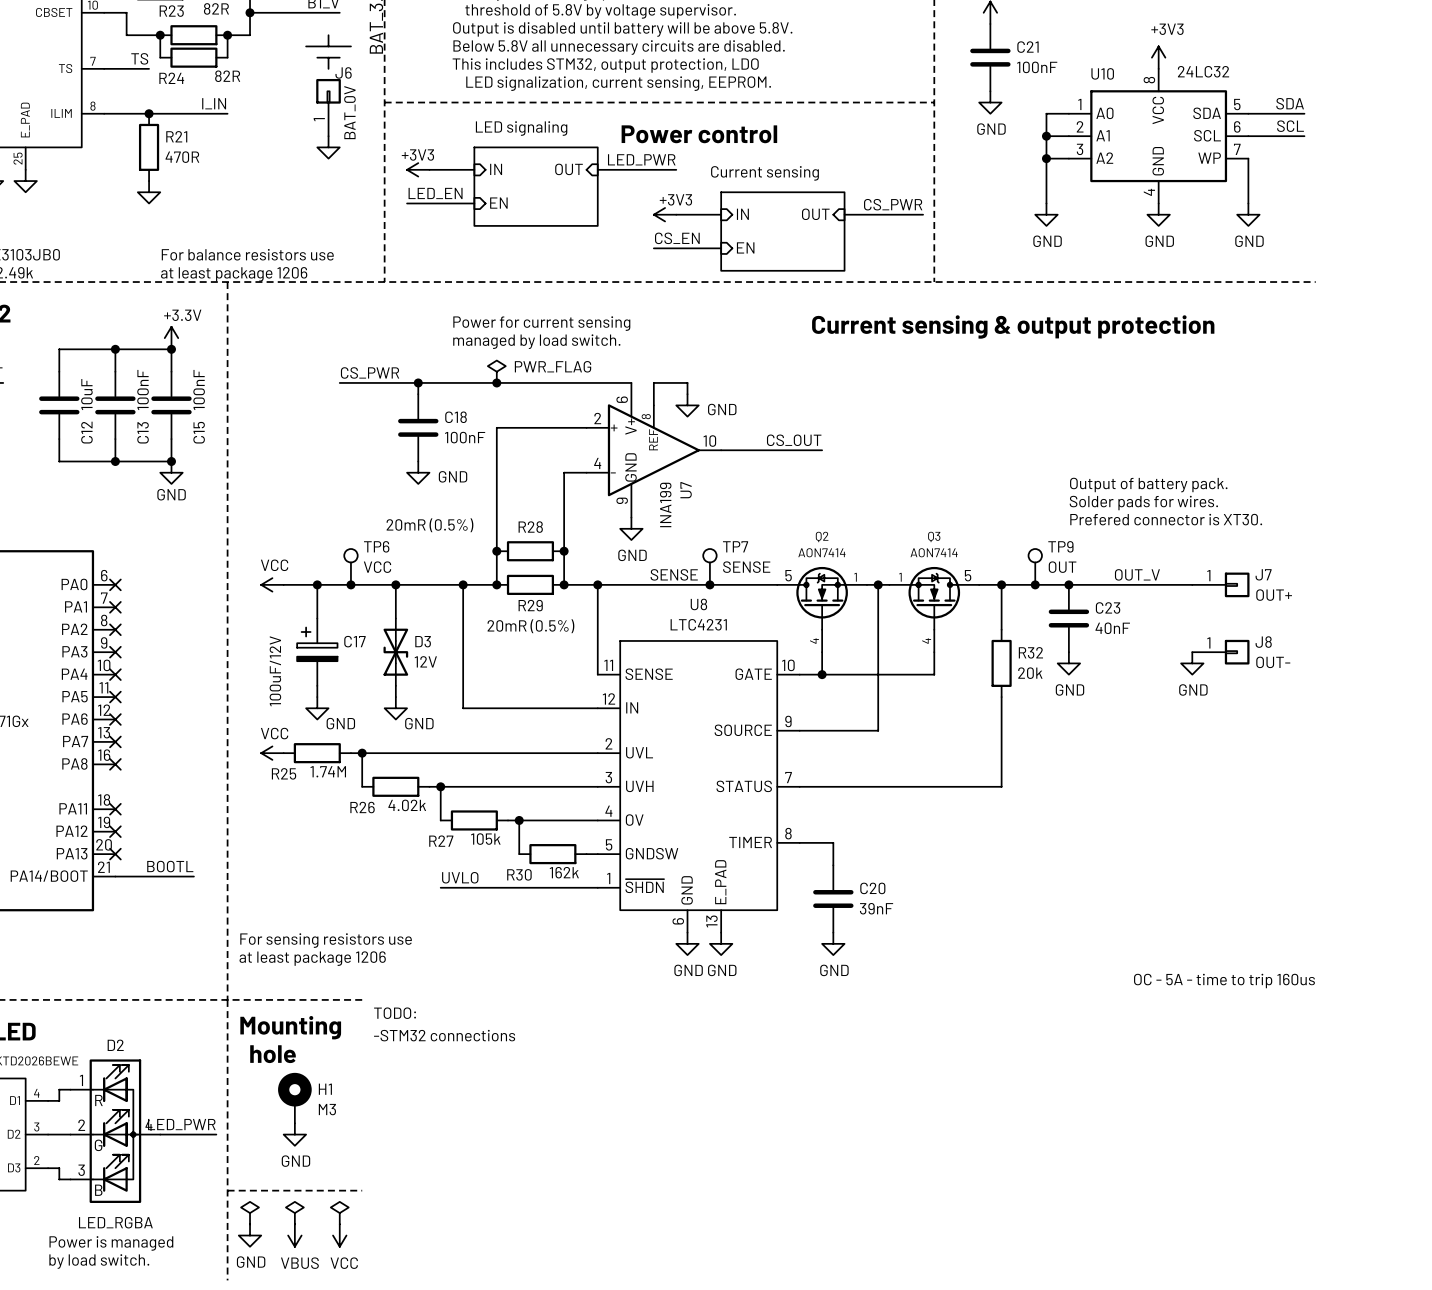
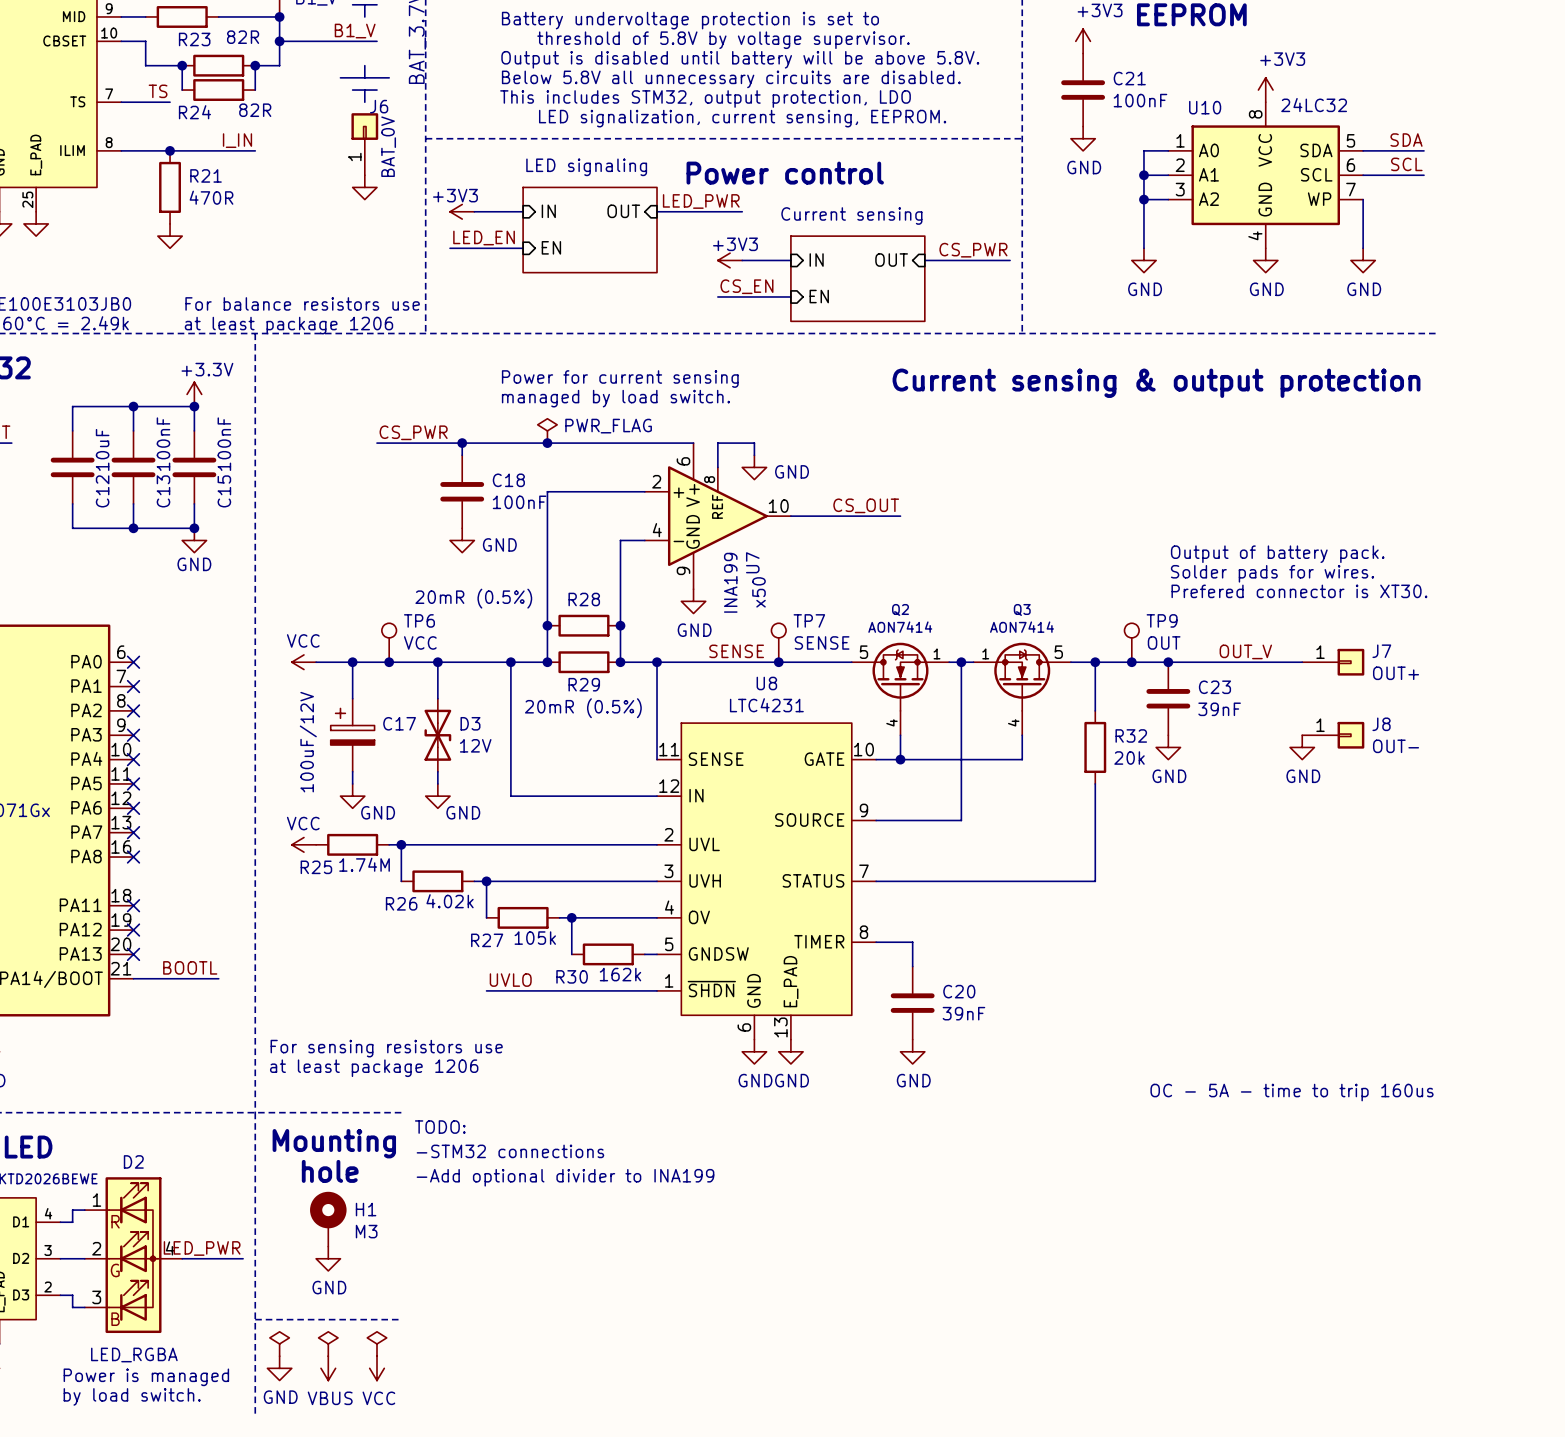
text: none -> x50 (759, 592)
C23 value: 40nF (1112, 628) -> 39nF (1219, 709)
text: none -> -Add optional divider to INA199 (565, 1177)

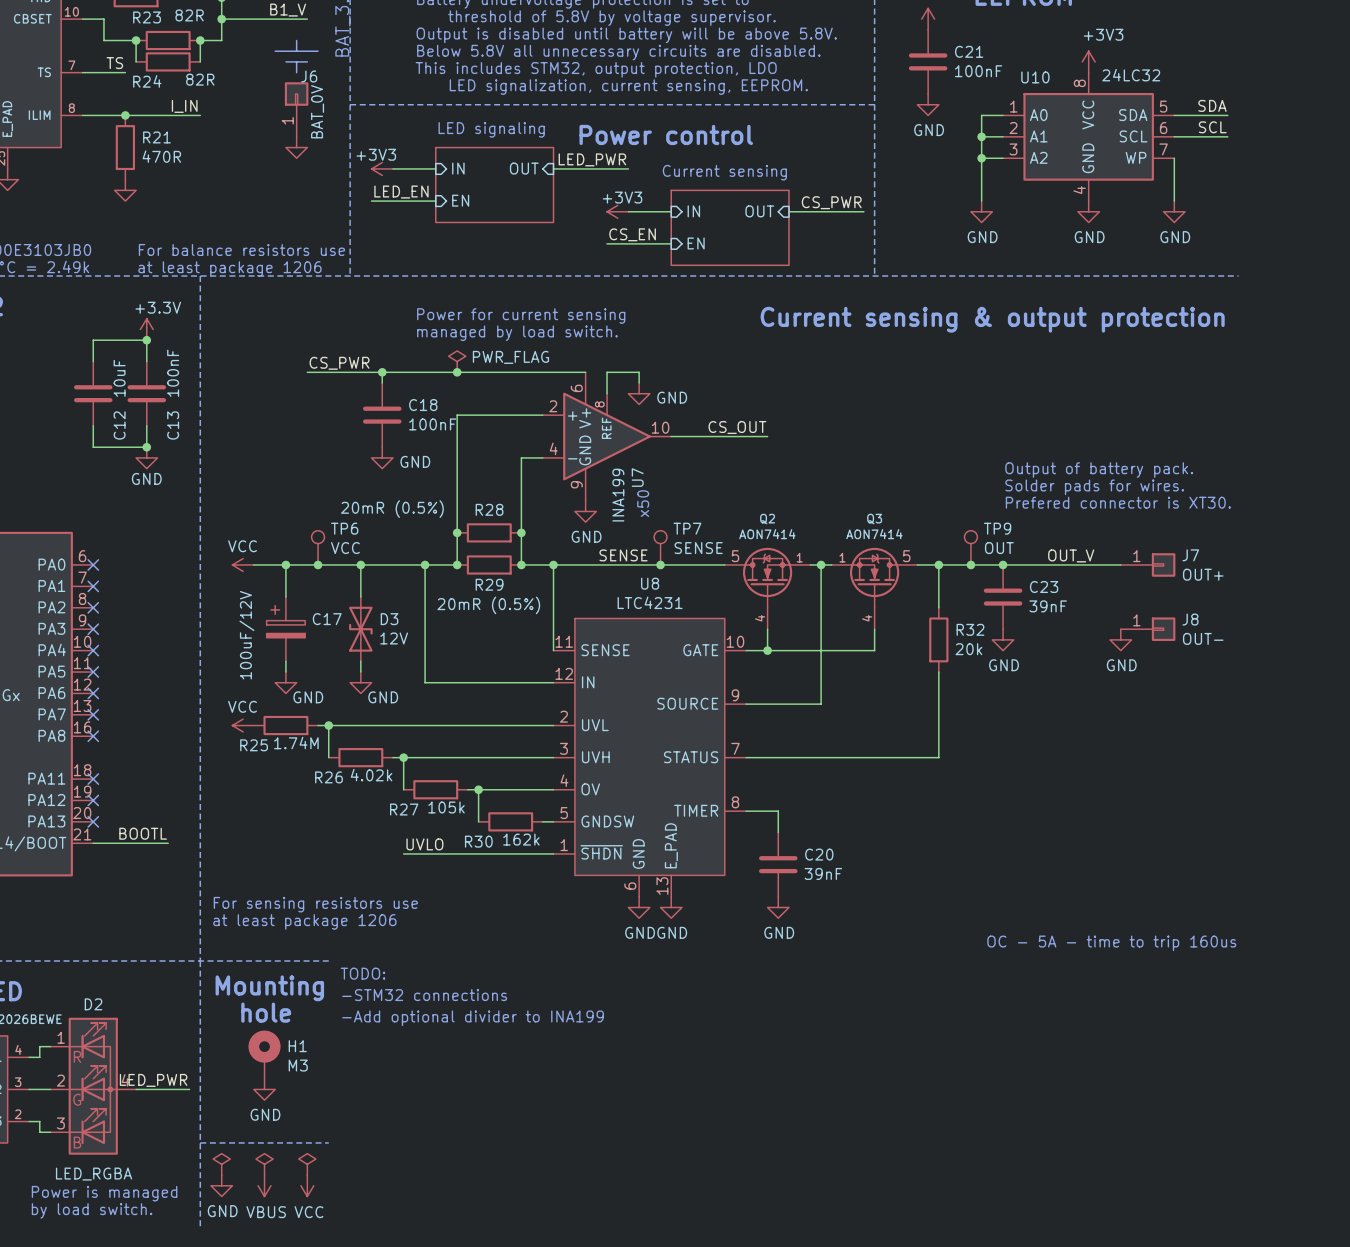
wire: (133, 406) (72, 406) (72, 430) -> none
junction: (133, 406) -> none
C13 value: 100nF (163, 444) -> 10uF (119, 378)
C12: 10uF (72, 467) -> none
C13 name: C13 (163, 491) -> C12 (119, 425)
C15 name: C15 (224, 491) -> C13 (173, 425)
wire: (72, 503) (72, 528) (133, 528) -> none
junction: (133, 528) -> none

